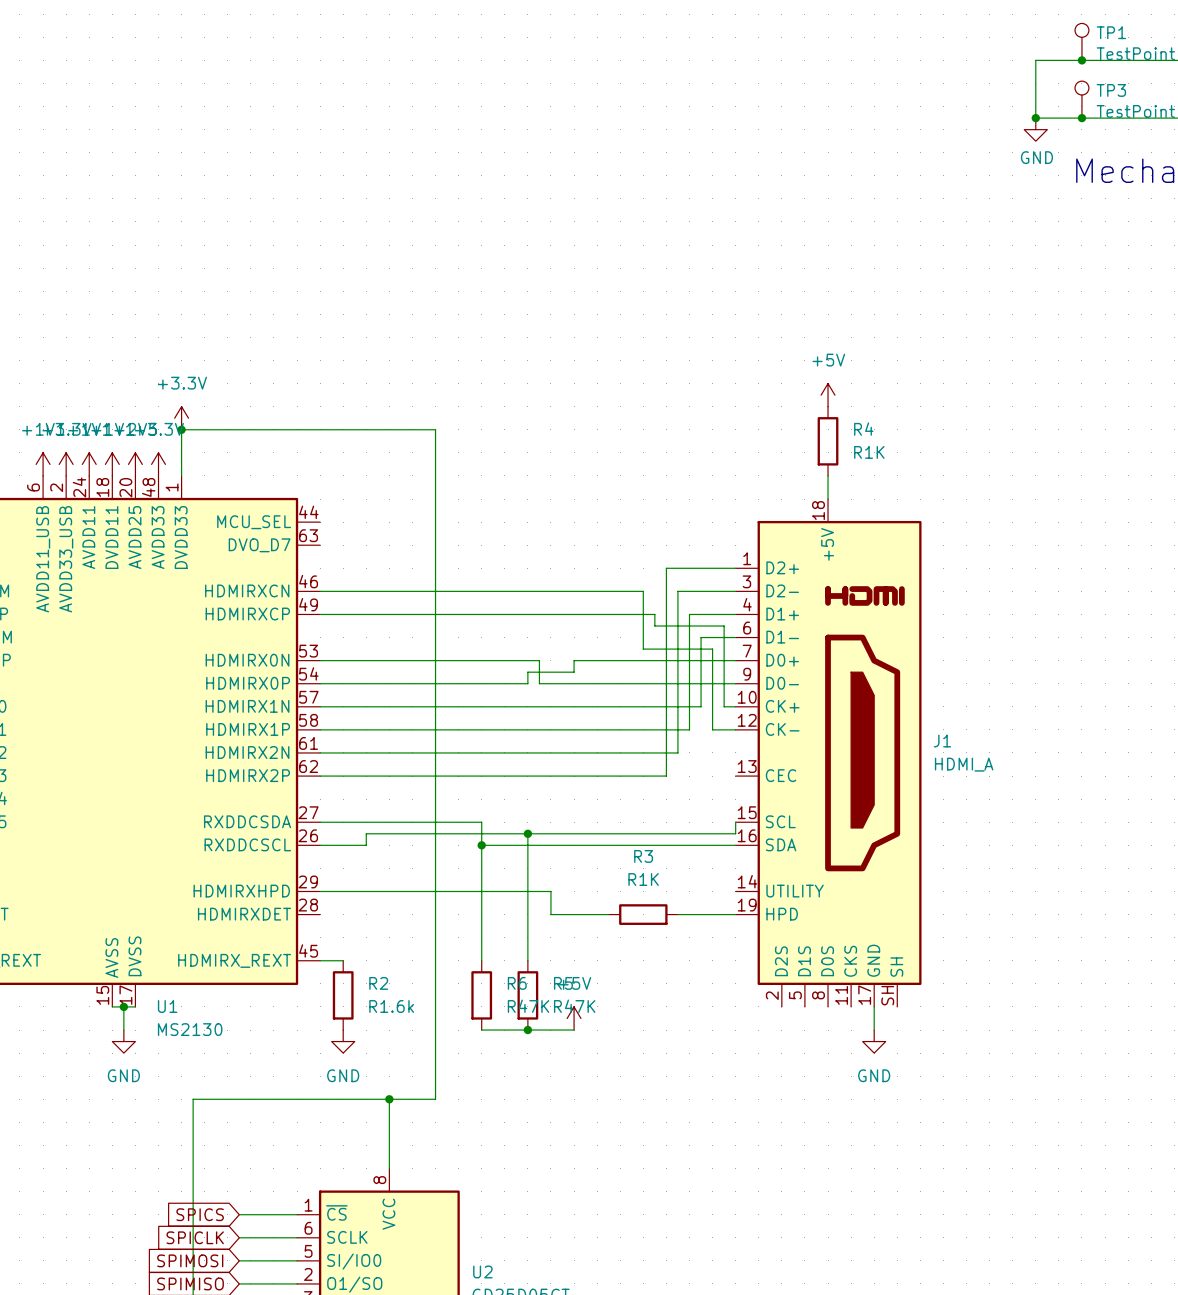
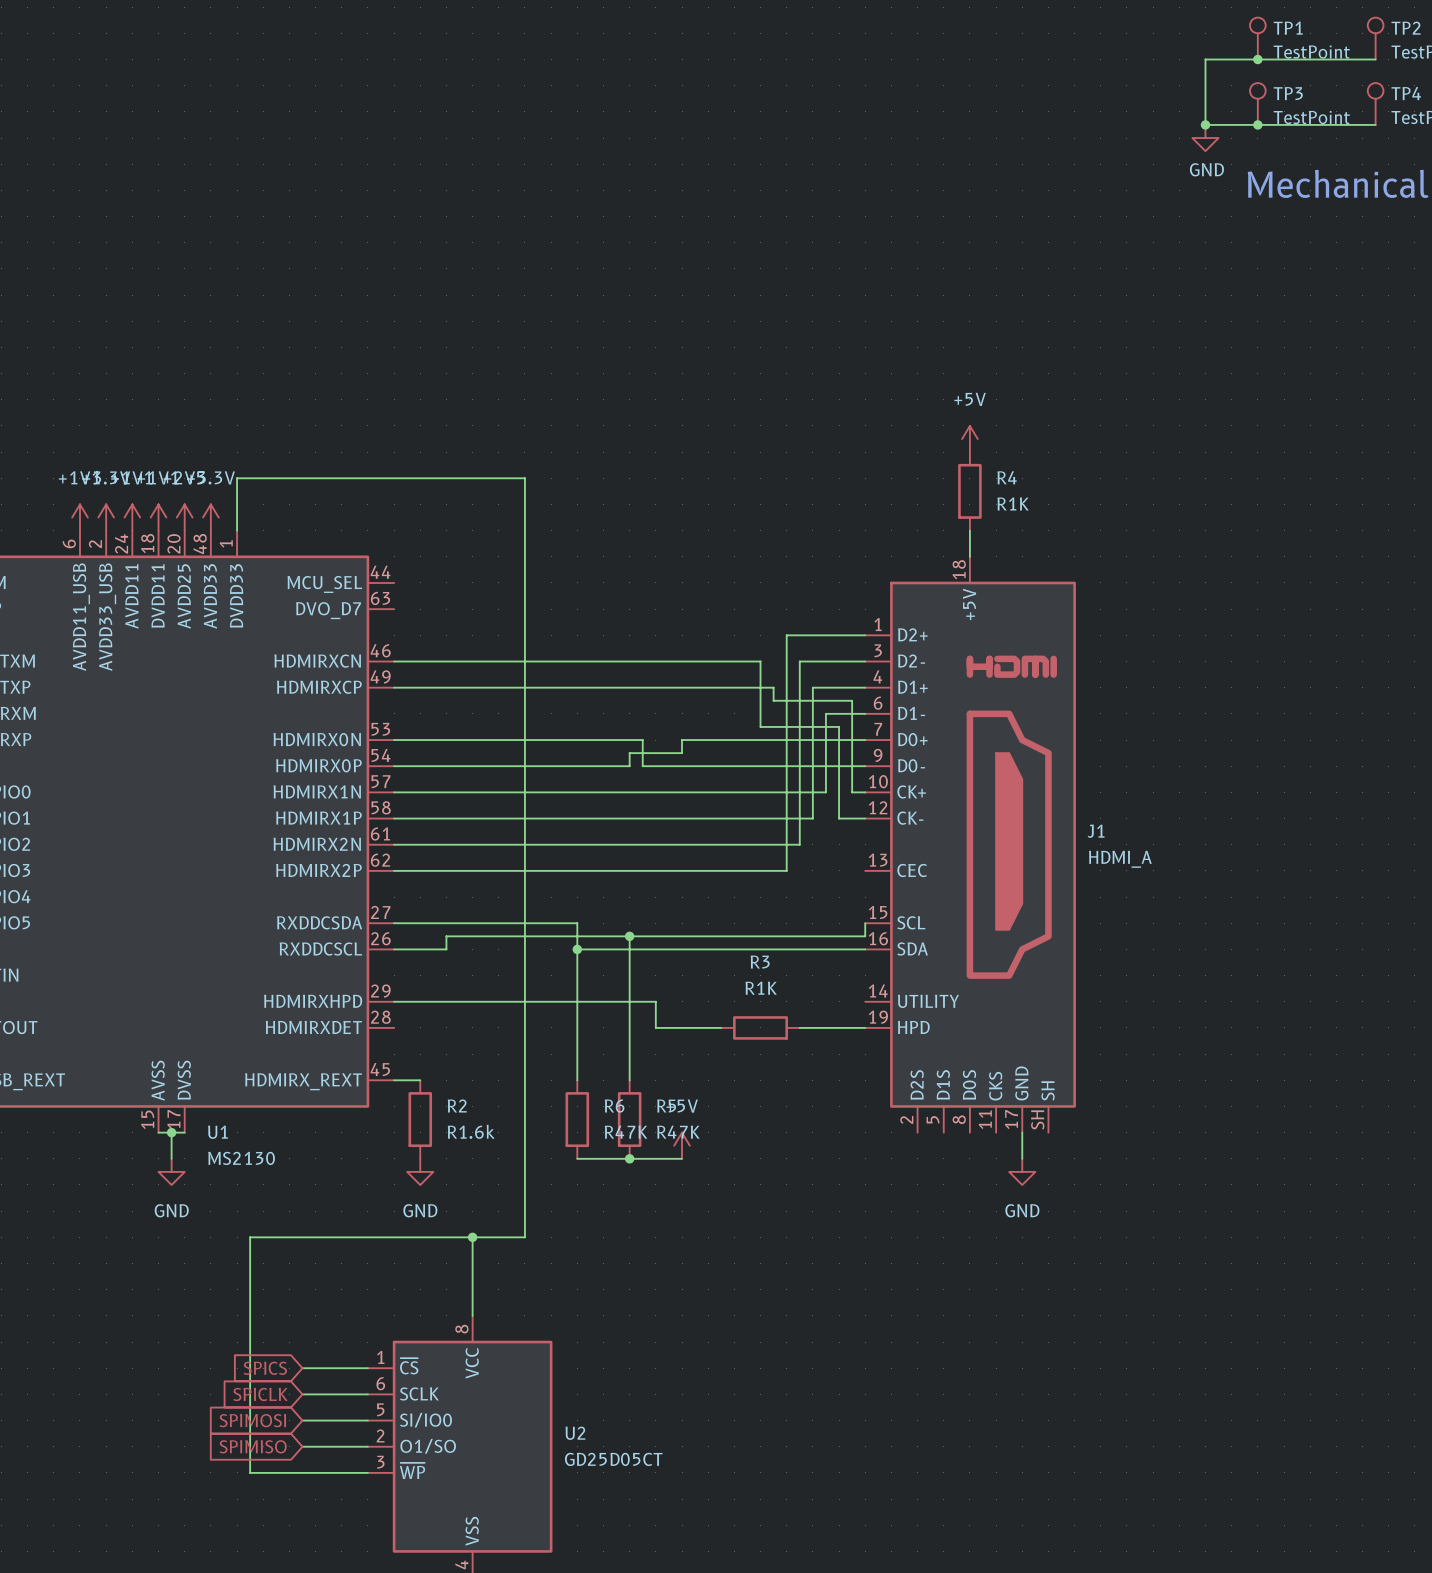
power symbol: +3.3V (181, 418) -> none
junction: (181, 429) -> none

